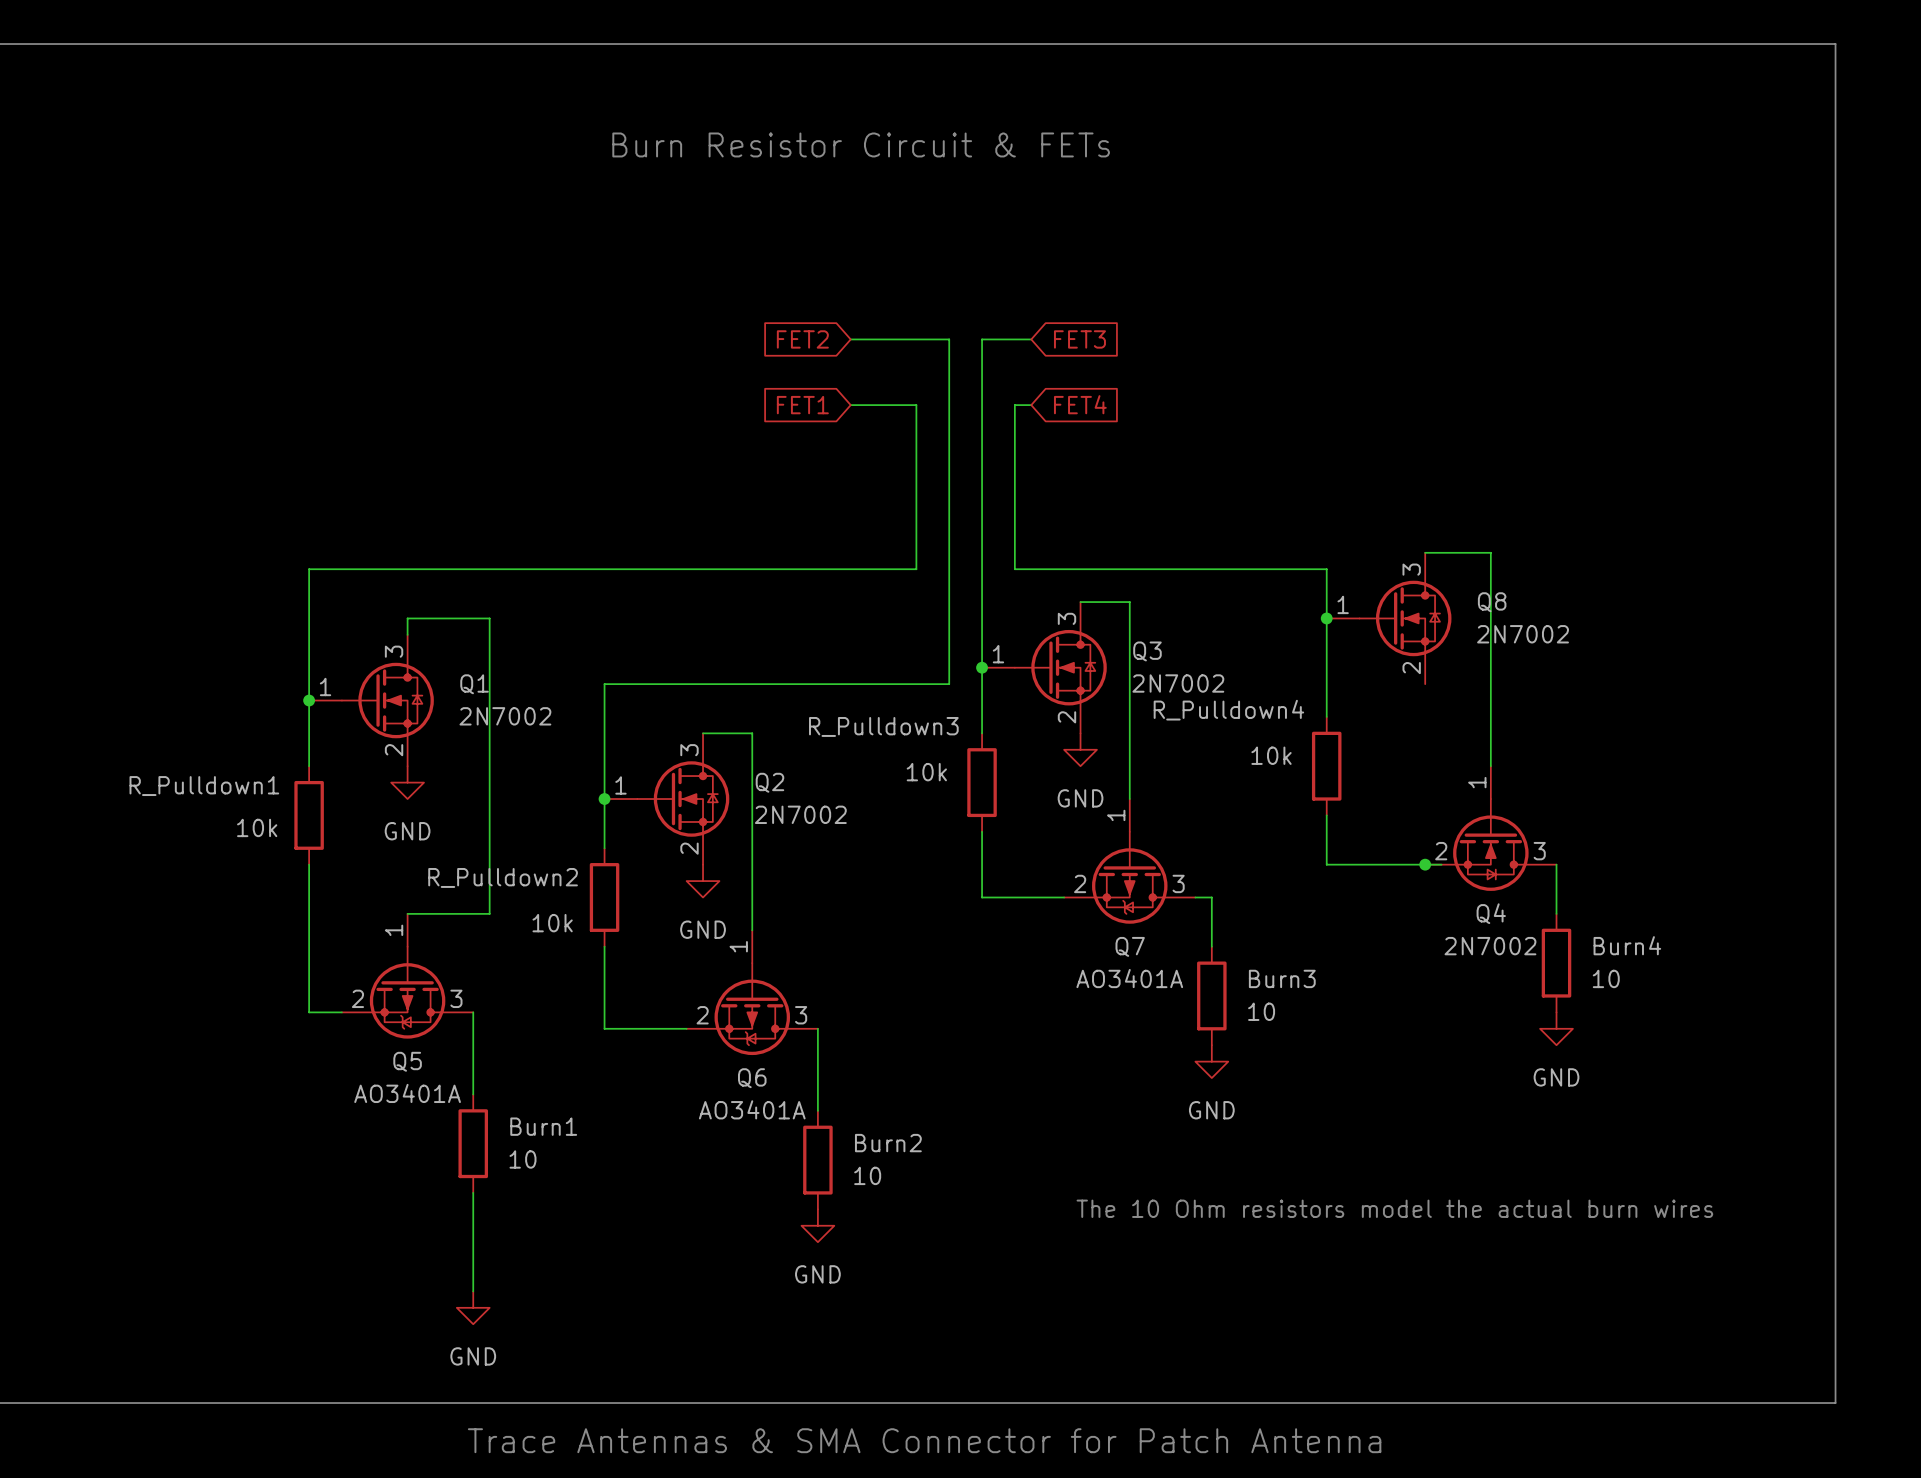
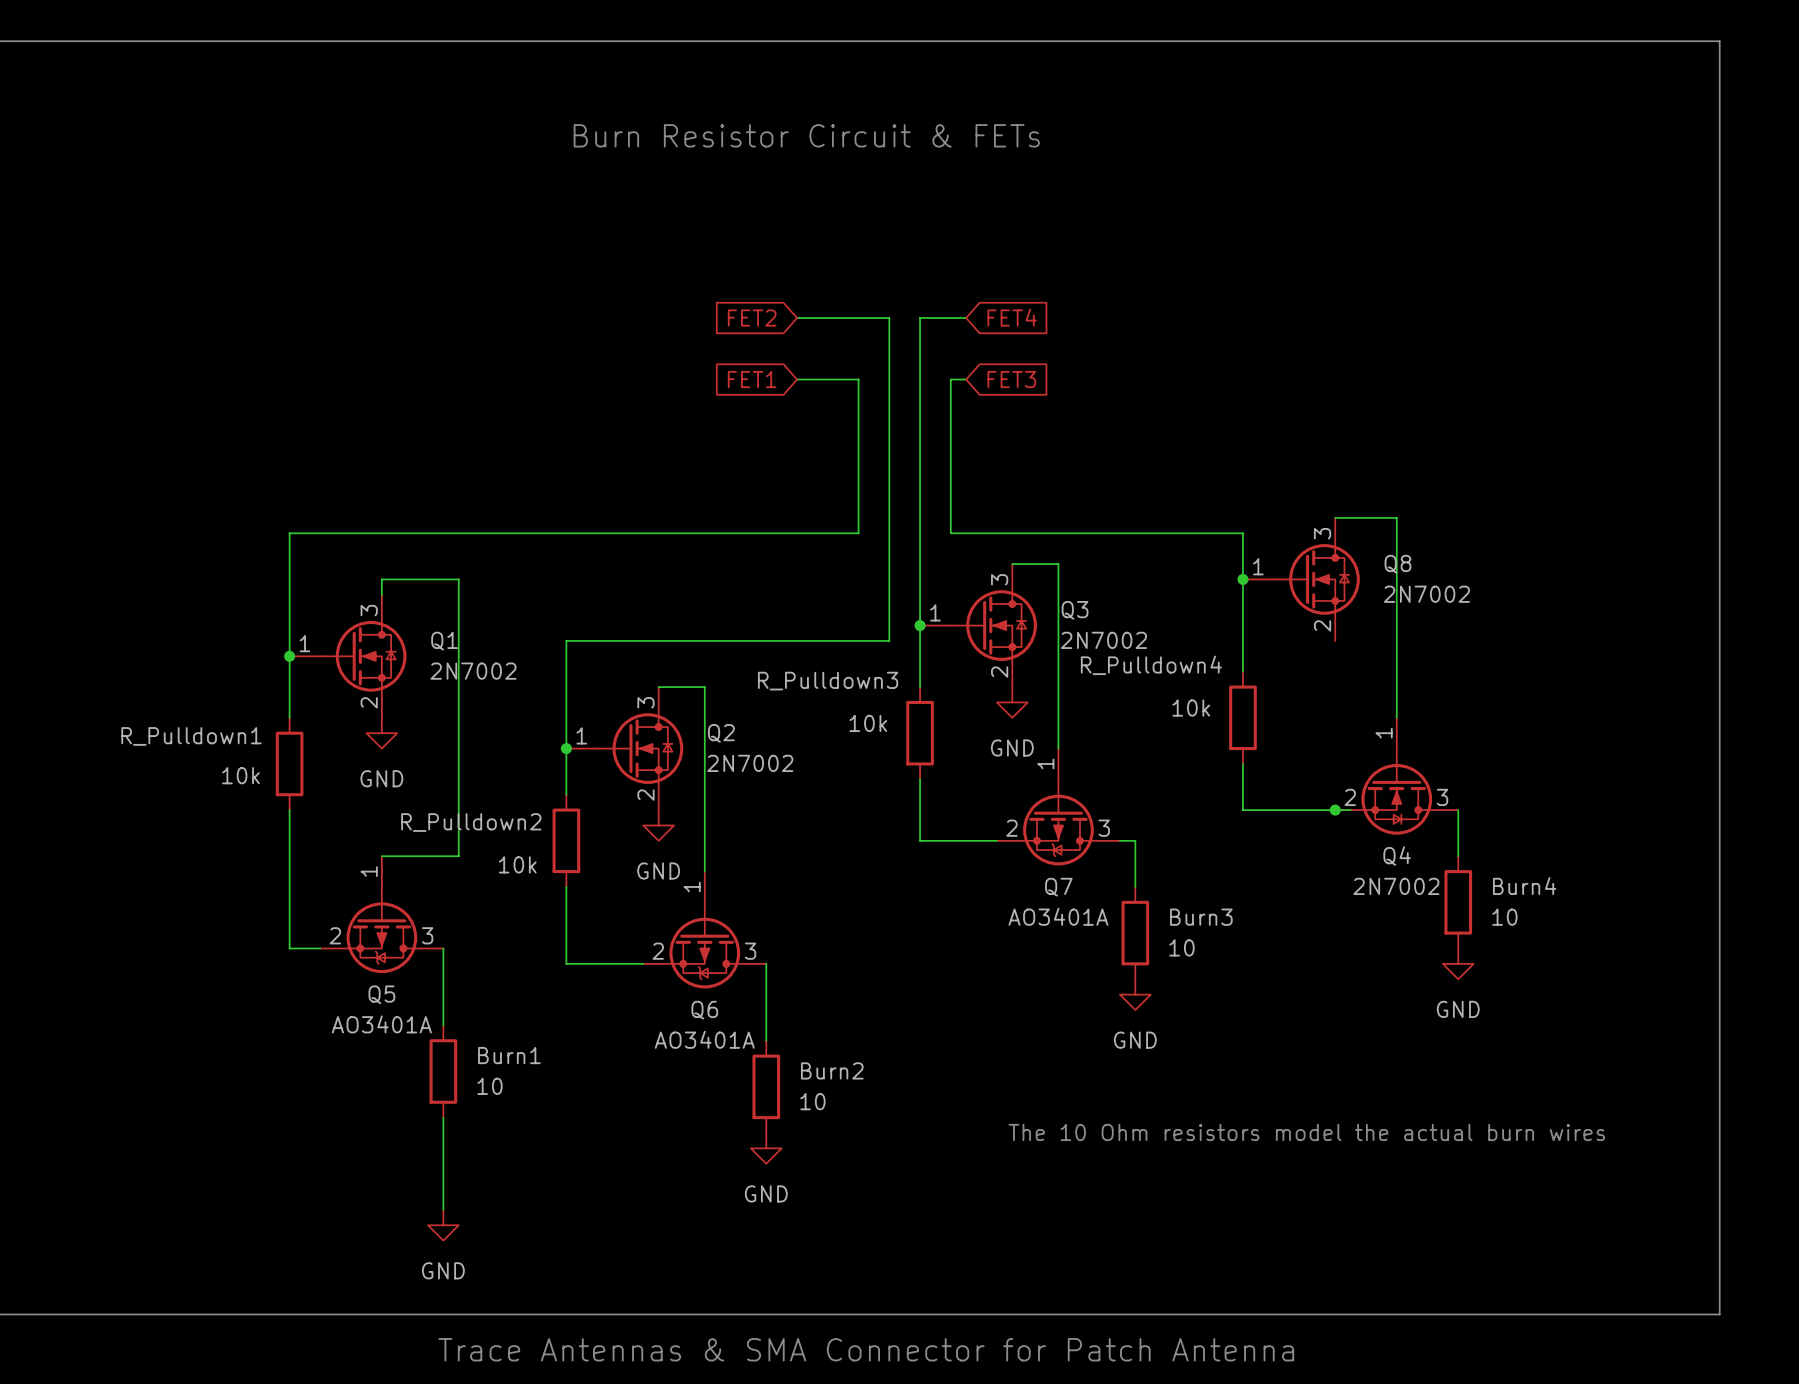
global label: FET3 (1079, 339) -> FET4 (1012, 317)
global label: FET4 (1080, 404) -> FET3 (1011, 379)

